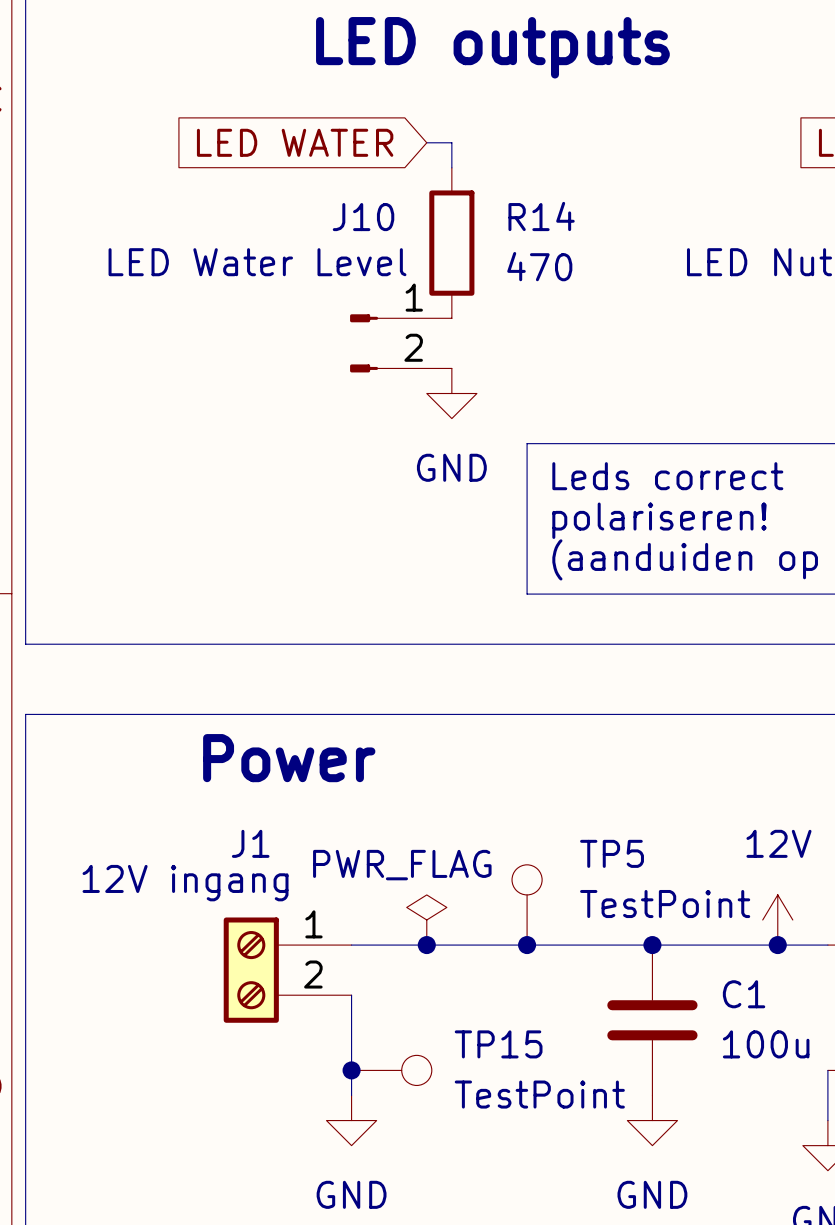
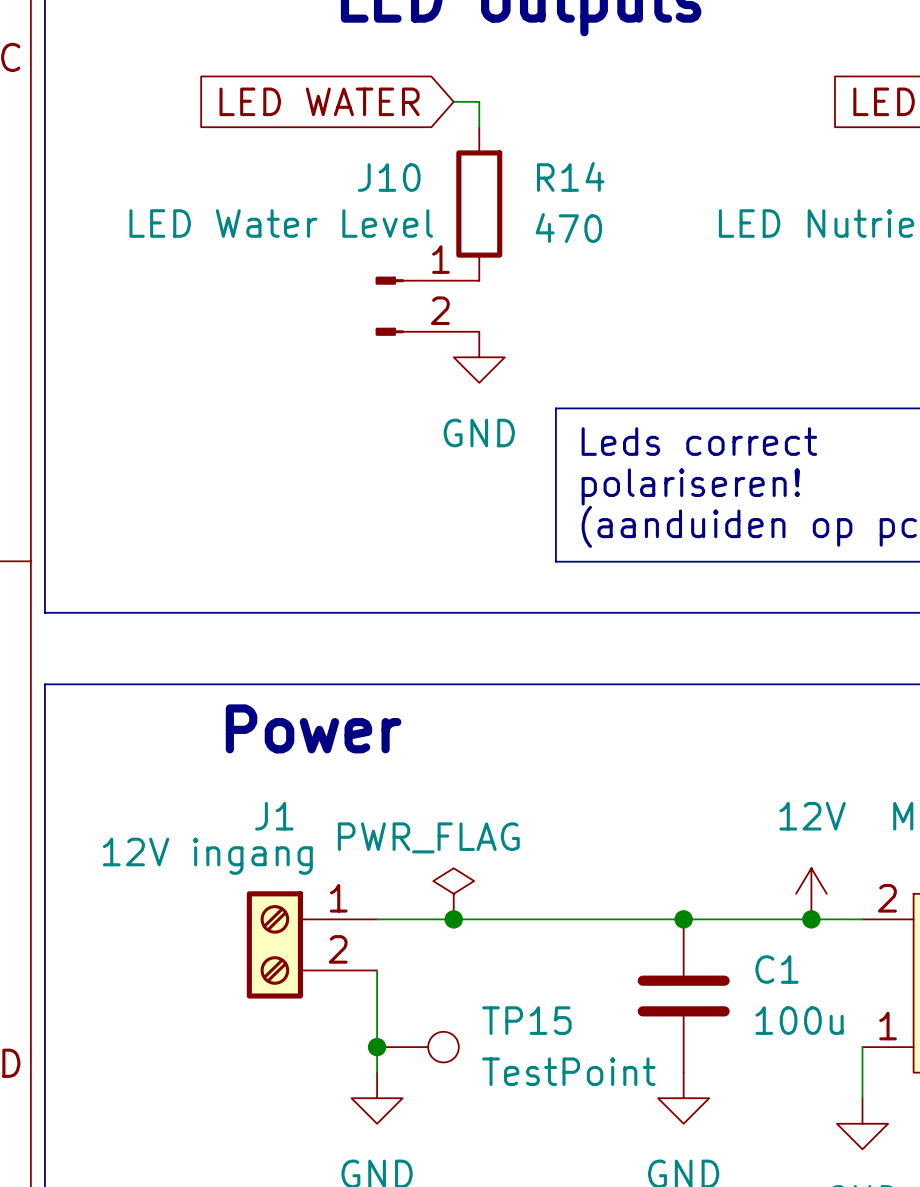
TP5: TestPoint (527, 904) -> none
junction: (527, 945) -> none

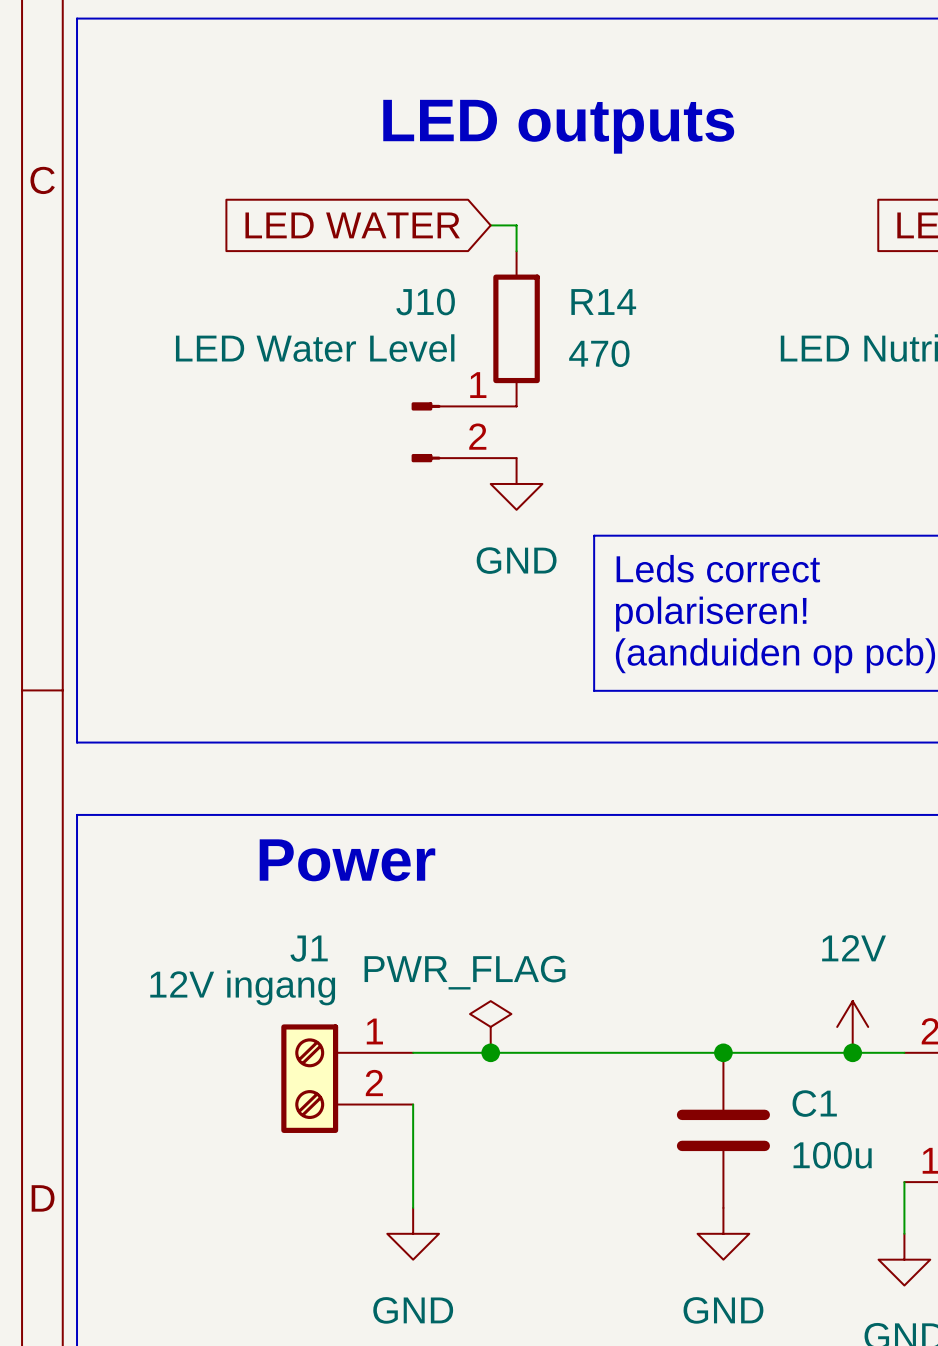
junction: (377, 1047) -> none
TP15: TestPoint (417, 1047) -> none

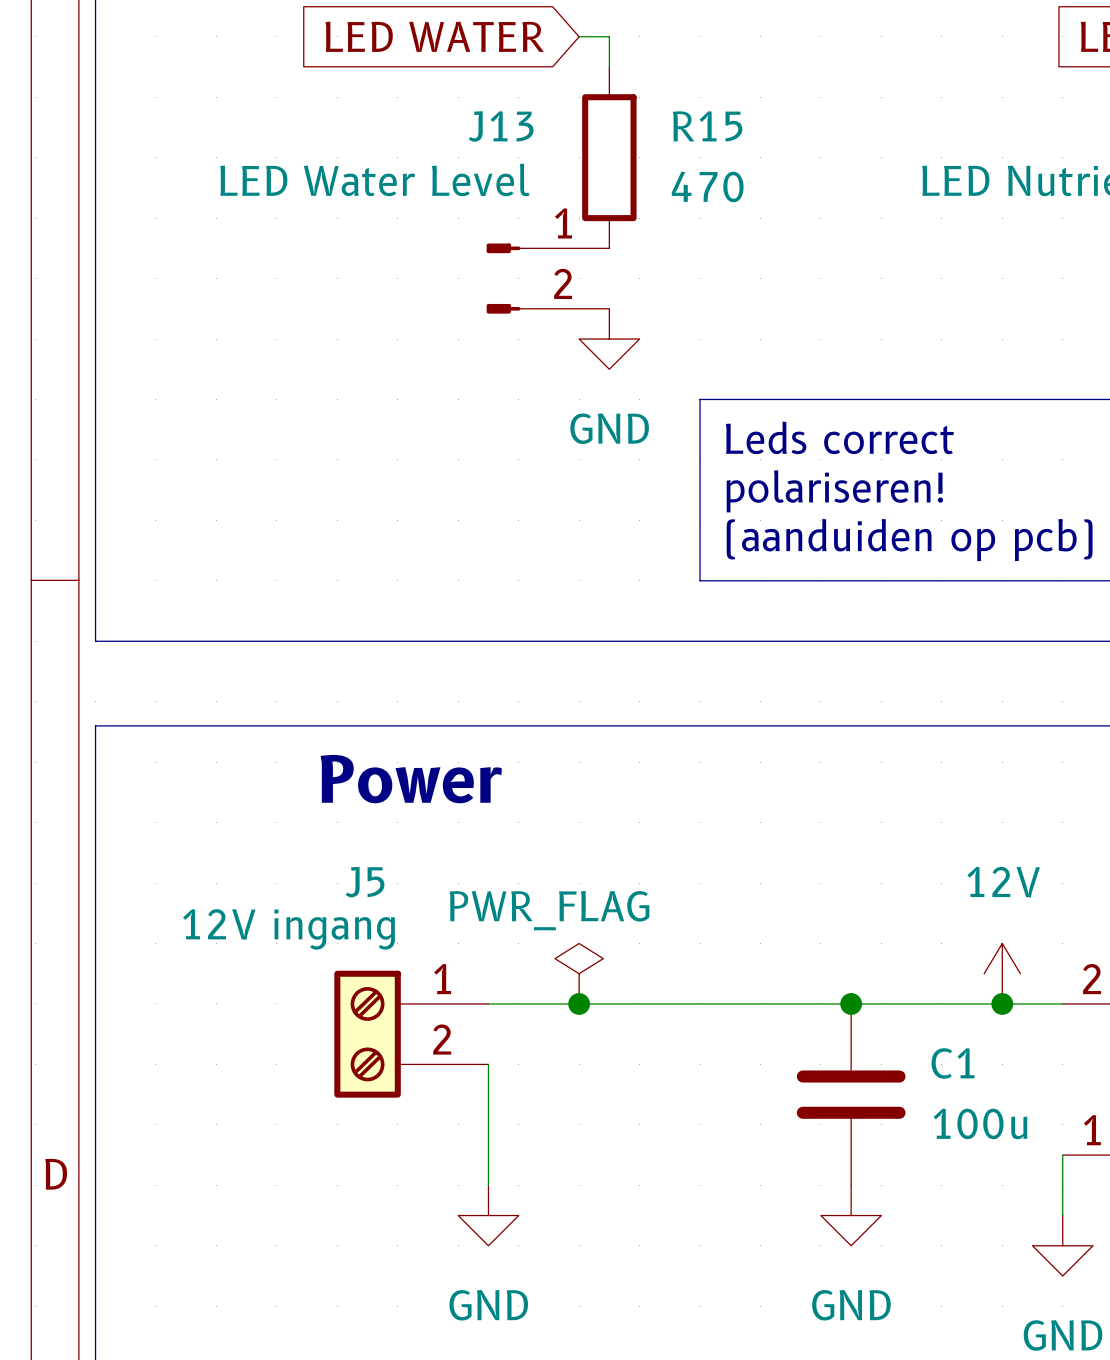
J10 name: J10 (425, 302) -> J13 (501, 126)
R14 name: R14 (603, 302) -> R15 (707, 126)
J1 name: J1 (309, 948) -> J5 (365, 882)

